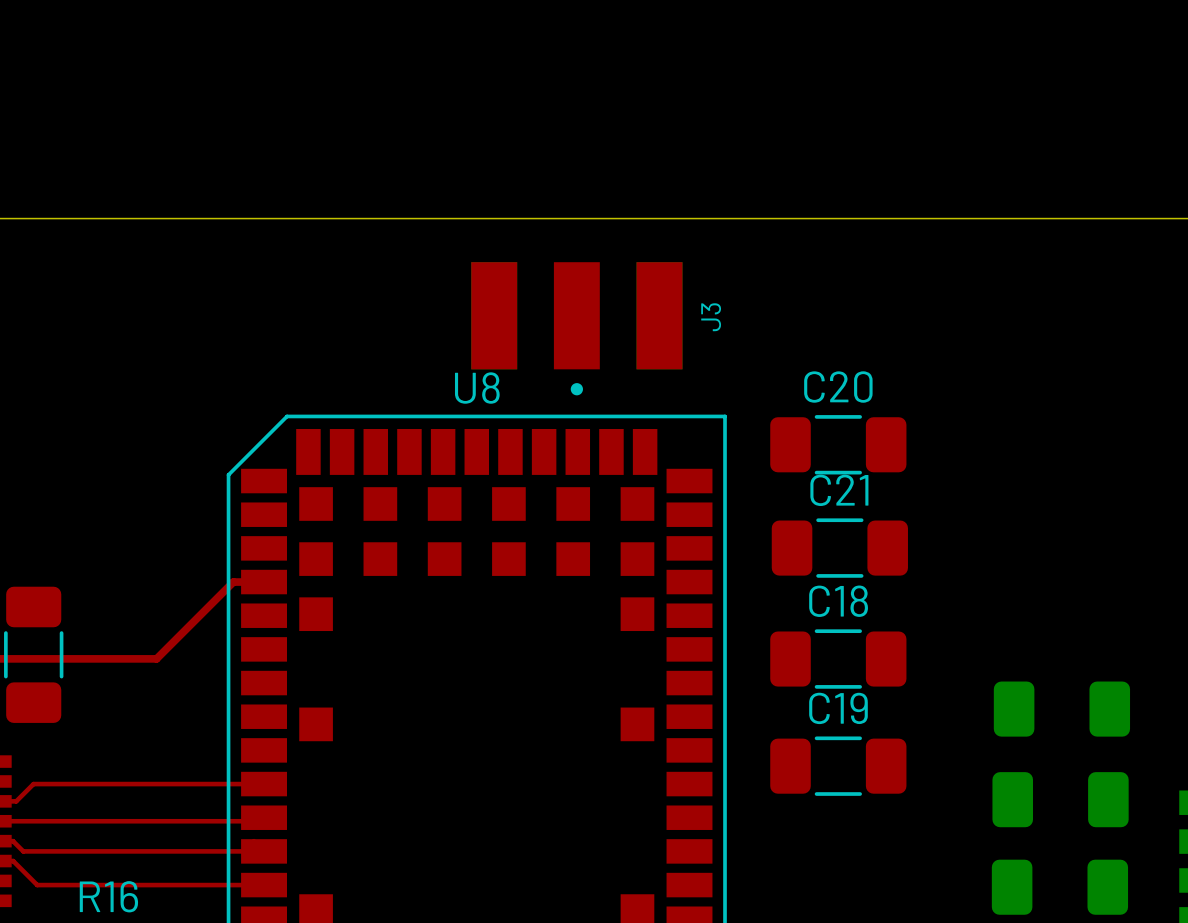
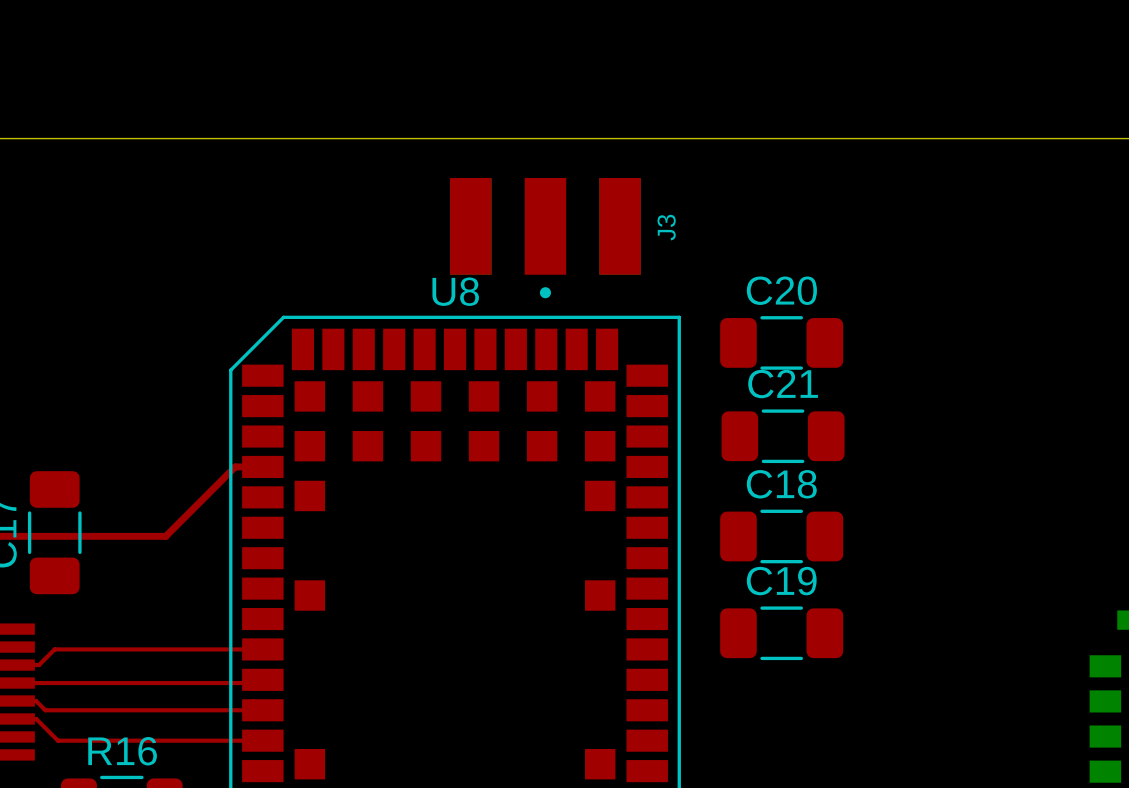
part: (1061, 709) -> none
part: (1060, 799) -> none
part: (1059, 887) -> none

